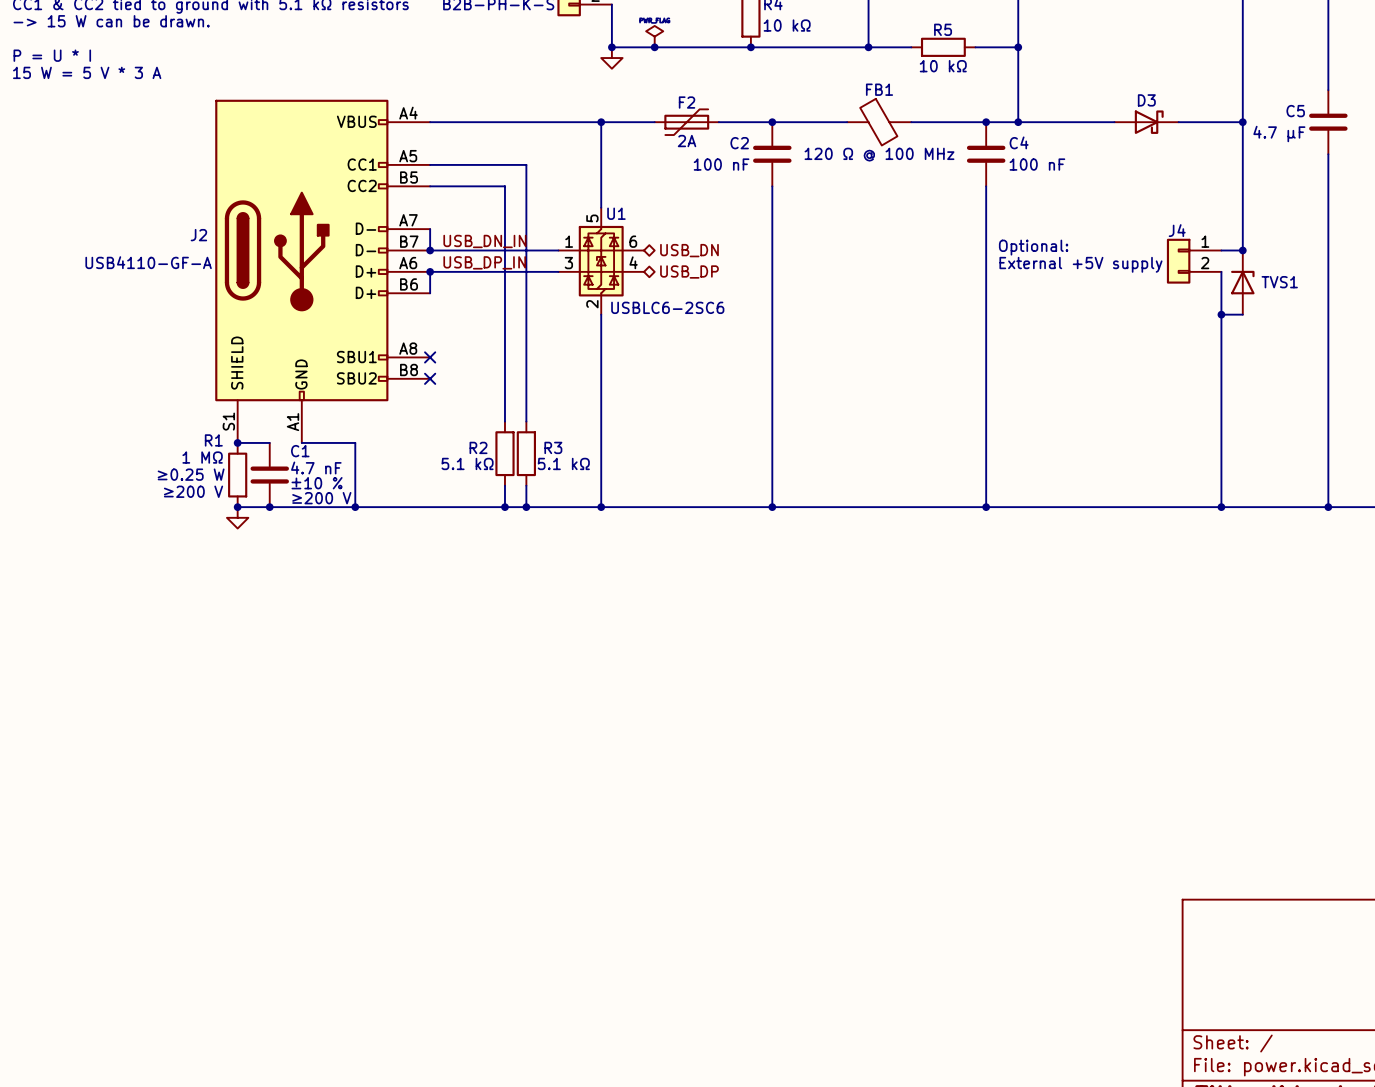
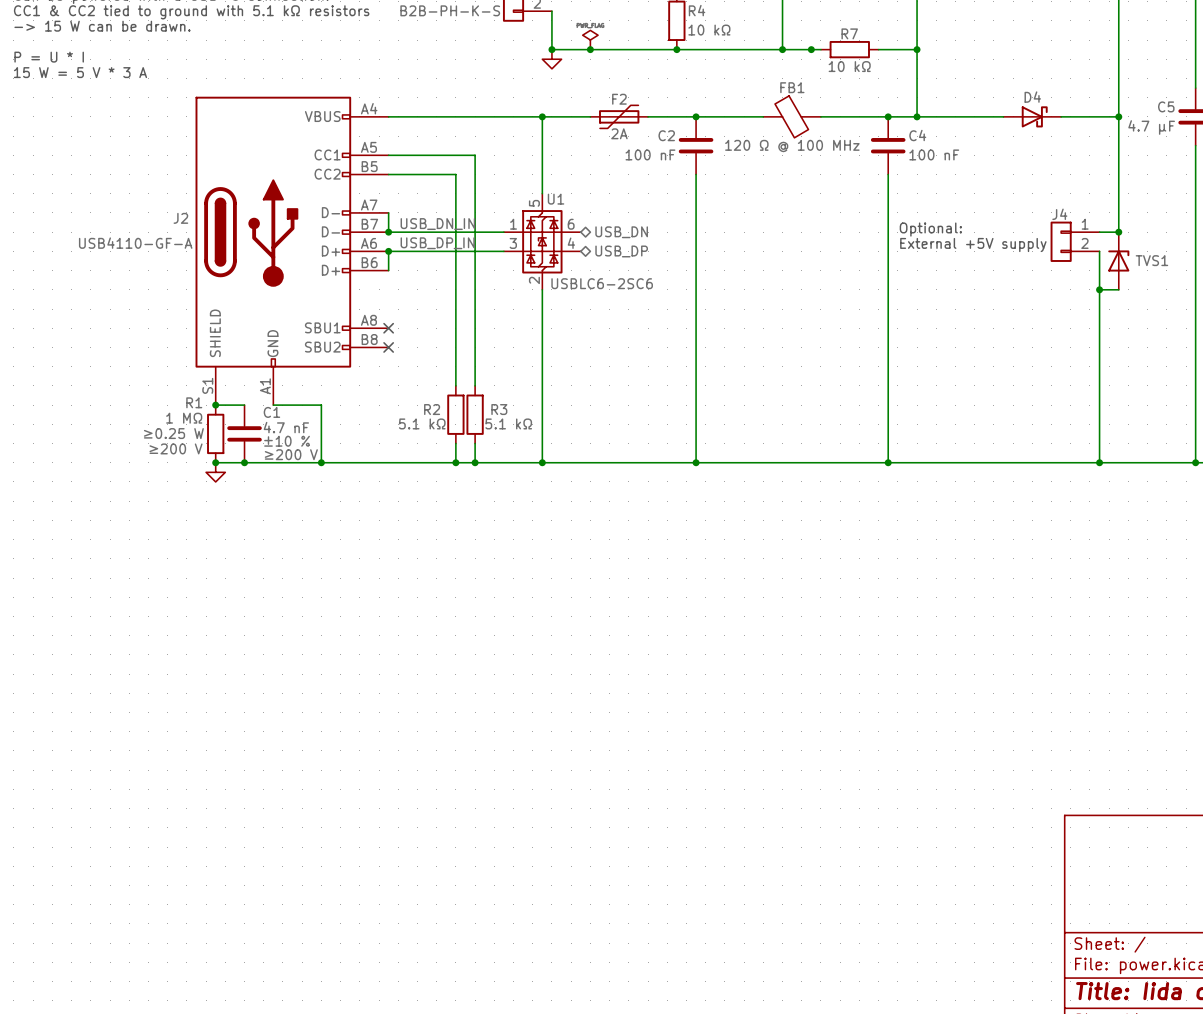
R5 name: R5 (943, 29) -> R7 (849, 33)
junction: none -> (811, 49)
D3 name: D3 (1146, 100) -> D4 (1032, 97)

